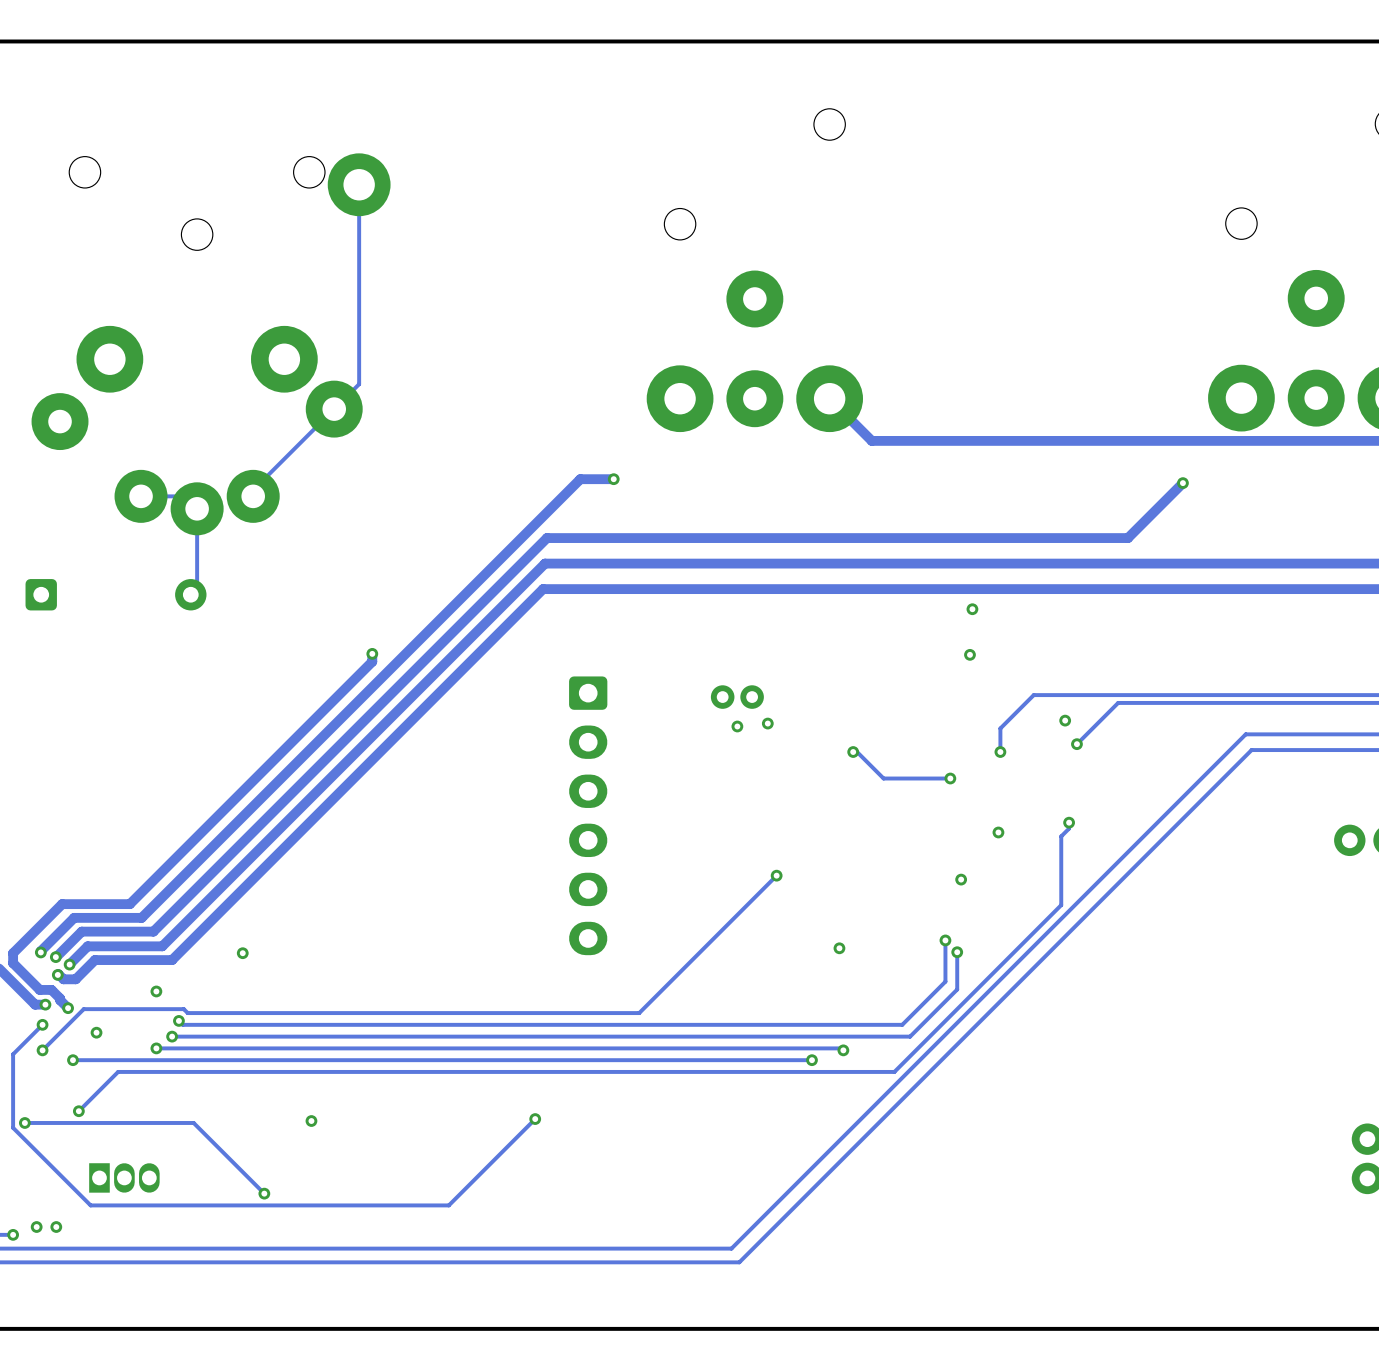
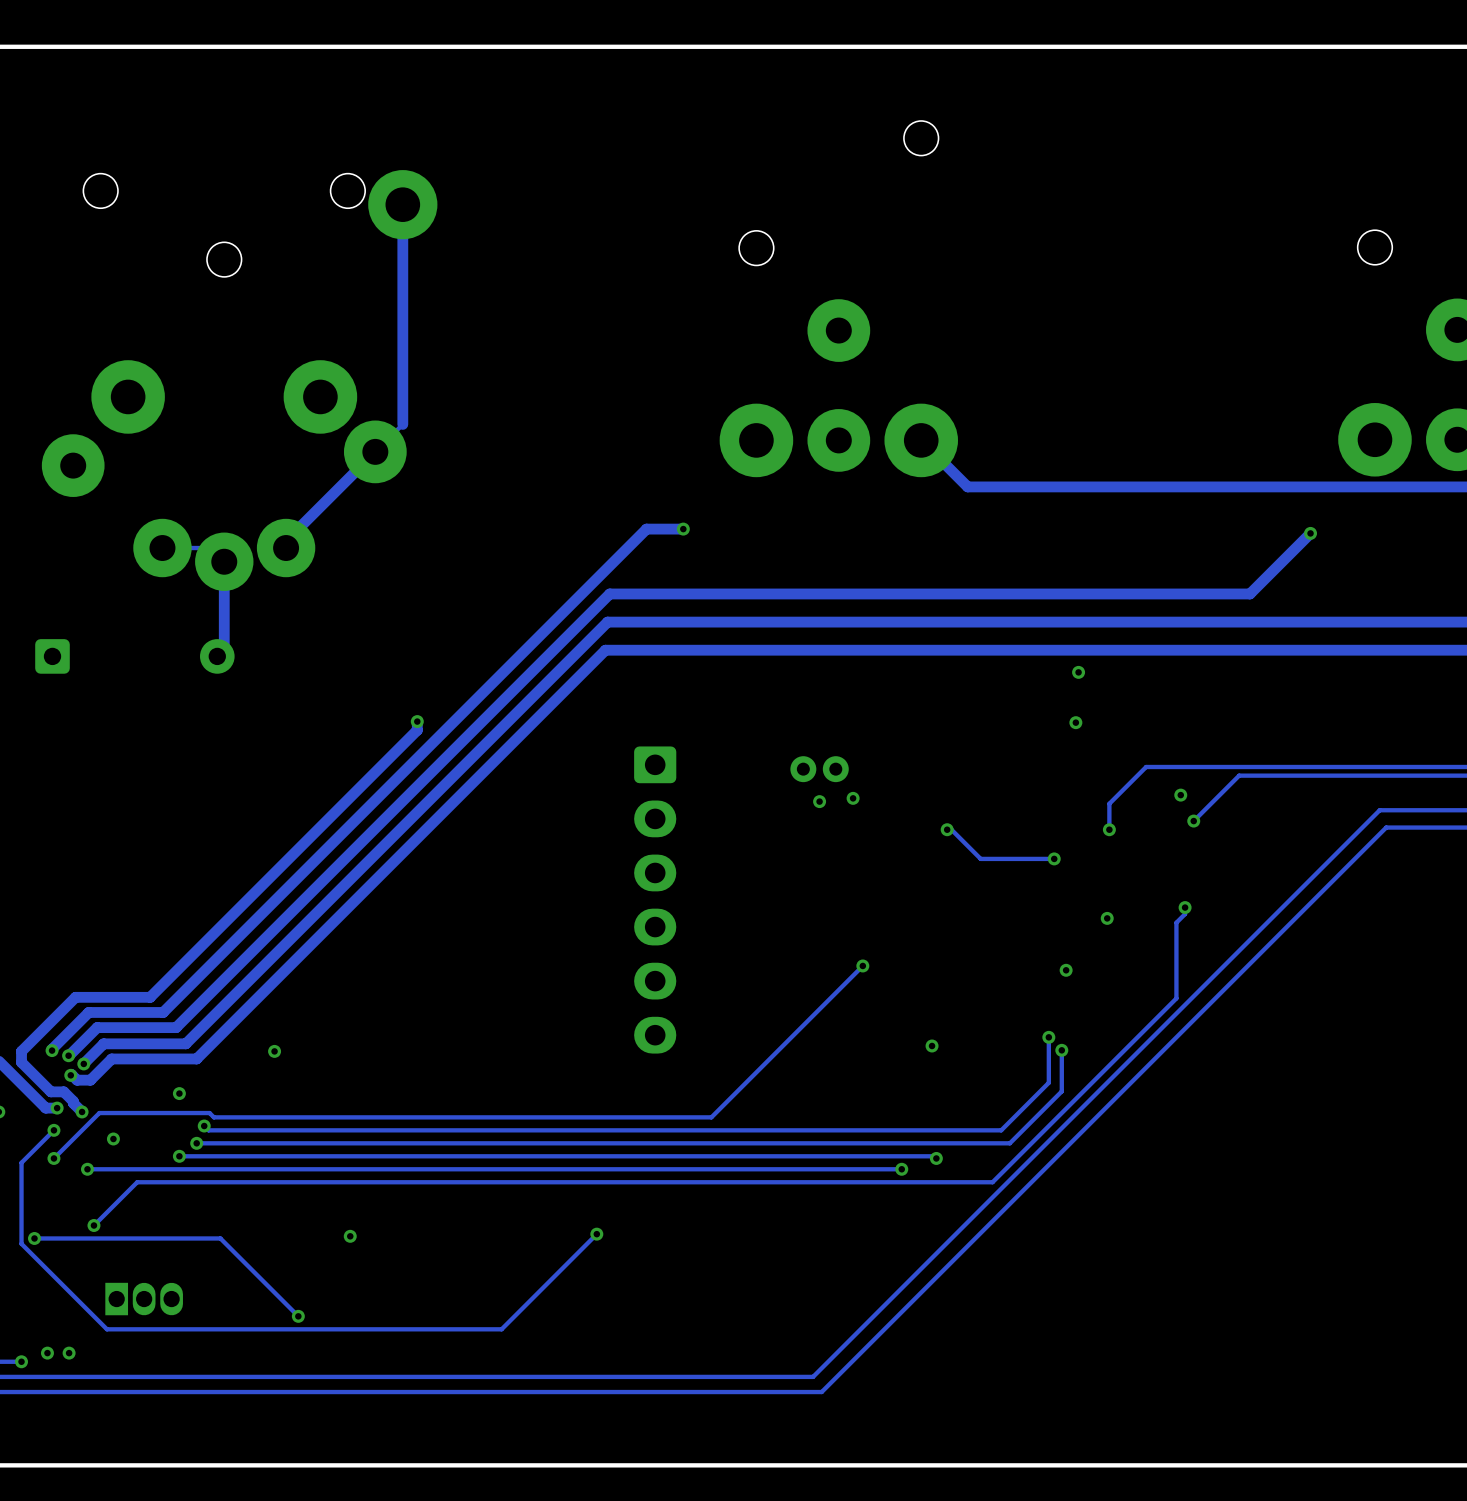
track width: thin (359, 184) (359, 384) -> thick (402, 204) (402, 424)
track width: thin (334, 409) (253, 490) -> thick (375, 451) (286, 541)
track width: thin (197, 508) (197, 588) -> thick (224, 561) (224, 649)

